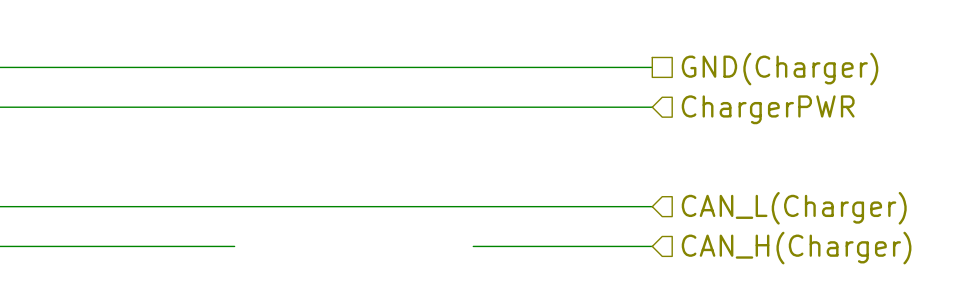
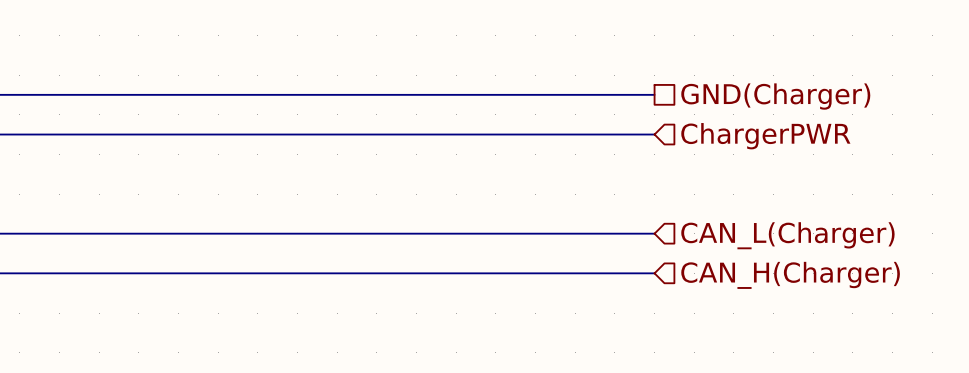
wire: none -> (238, 273) (476, 273)

